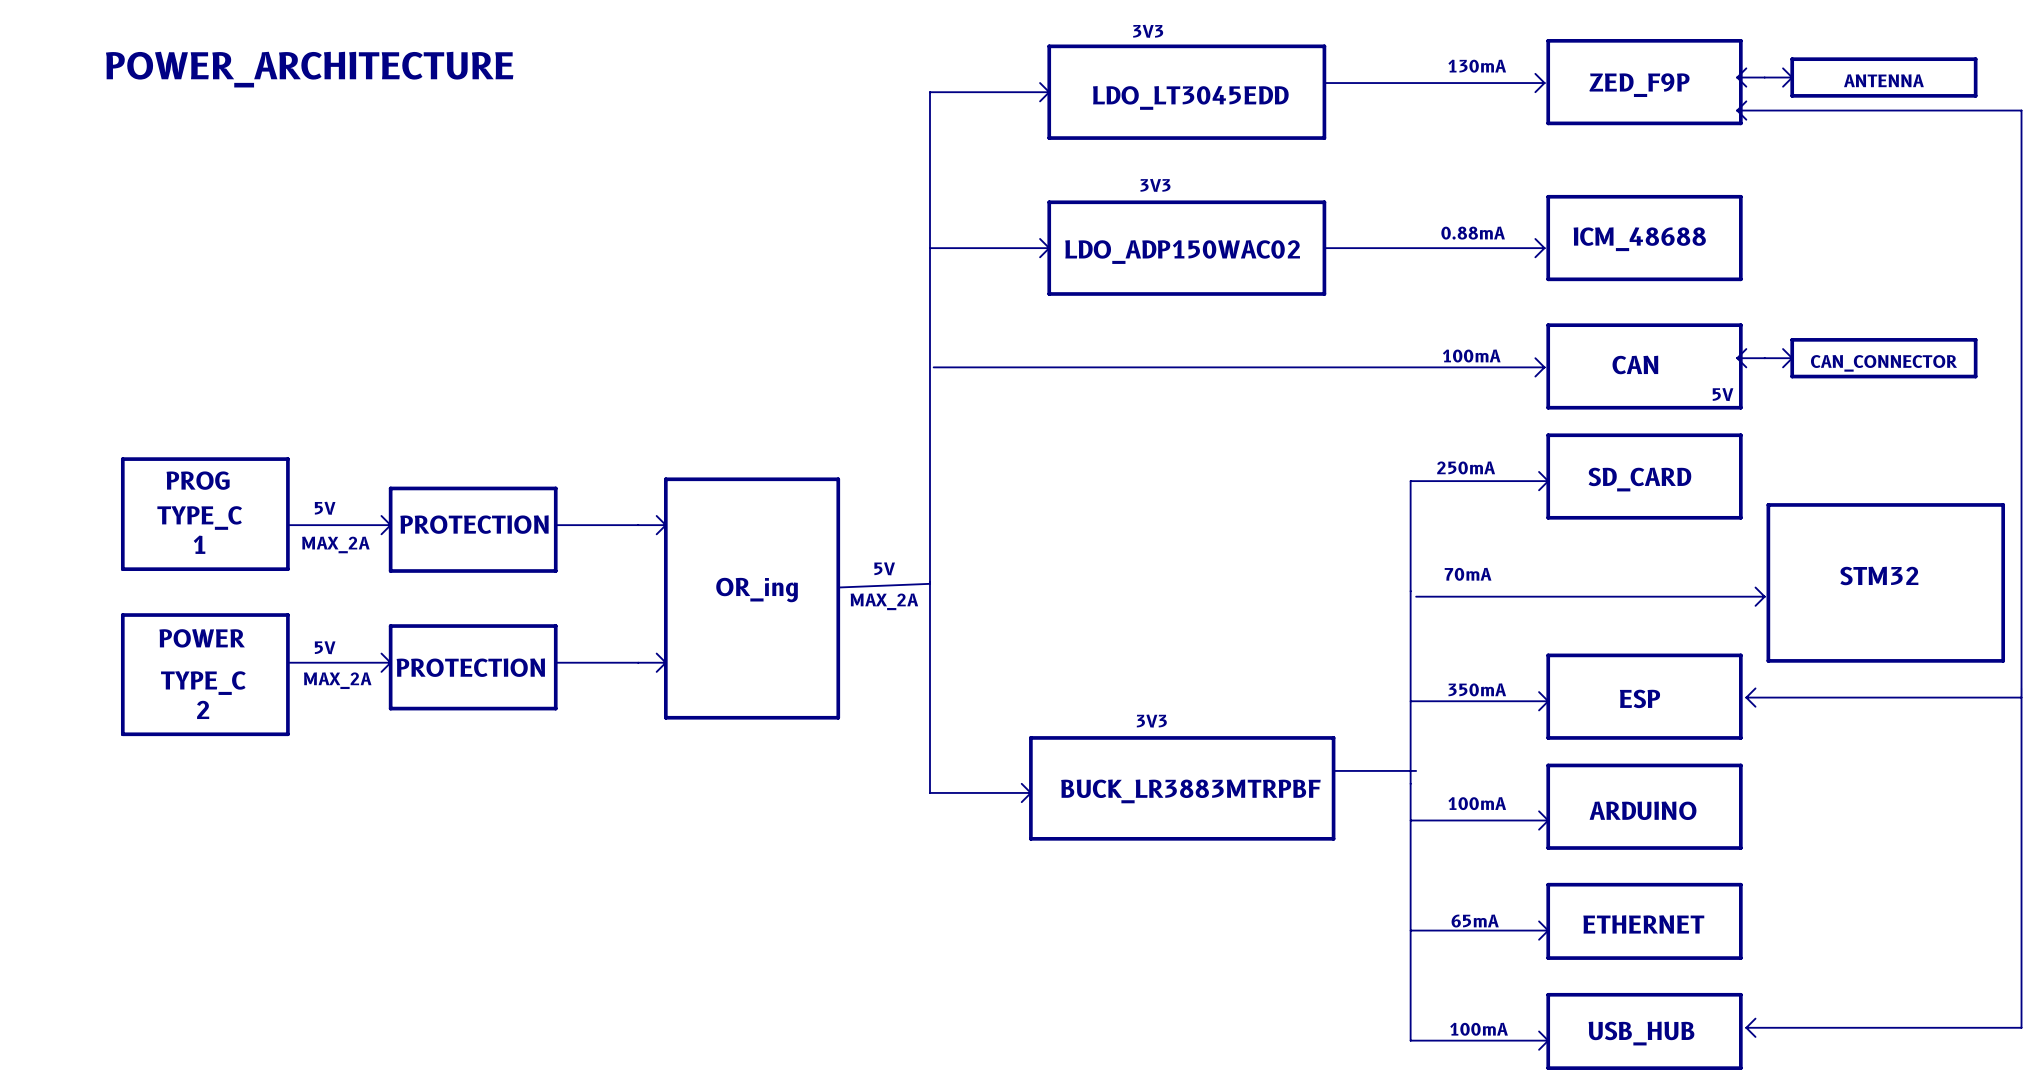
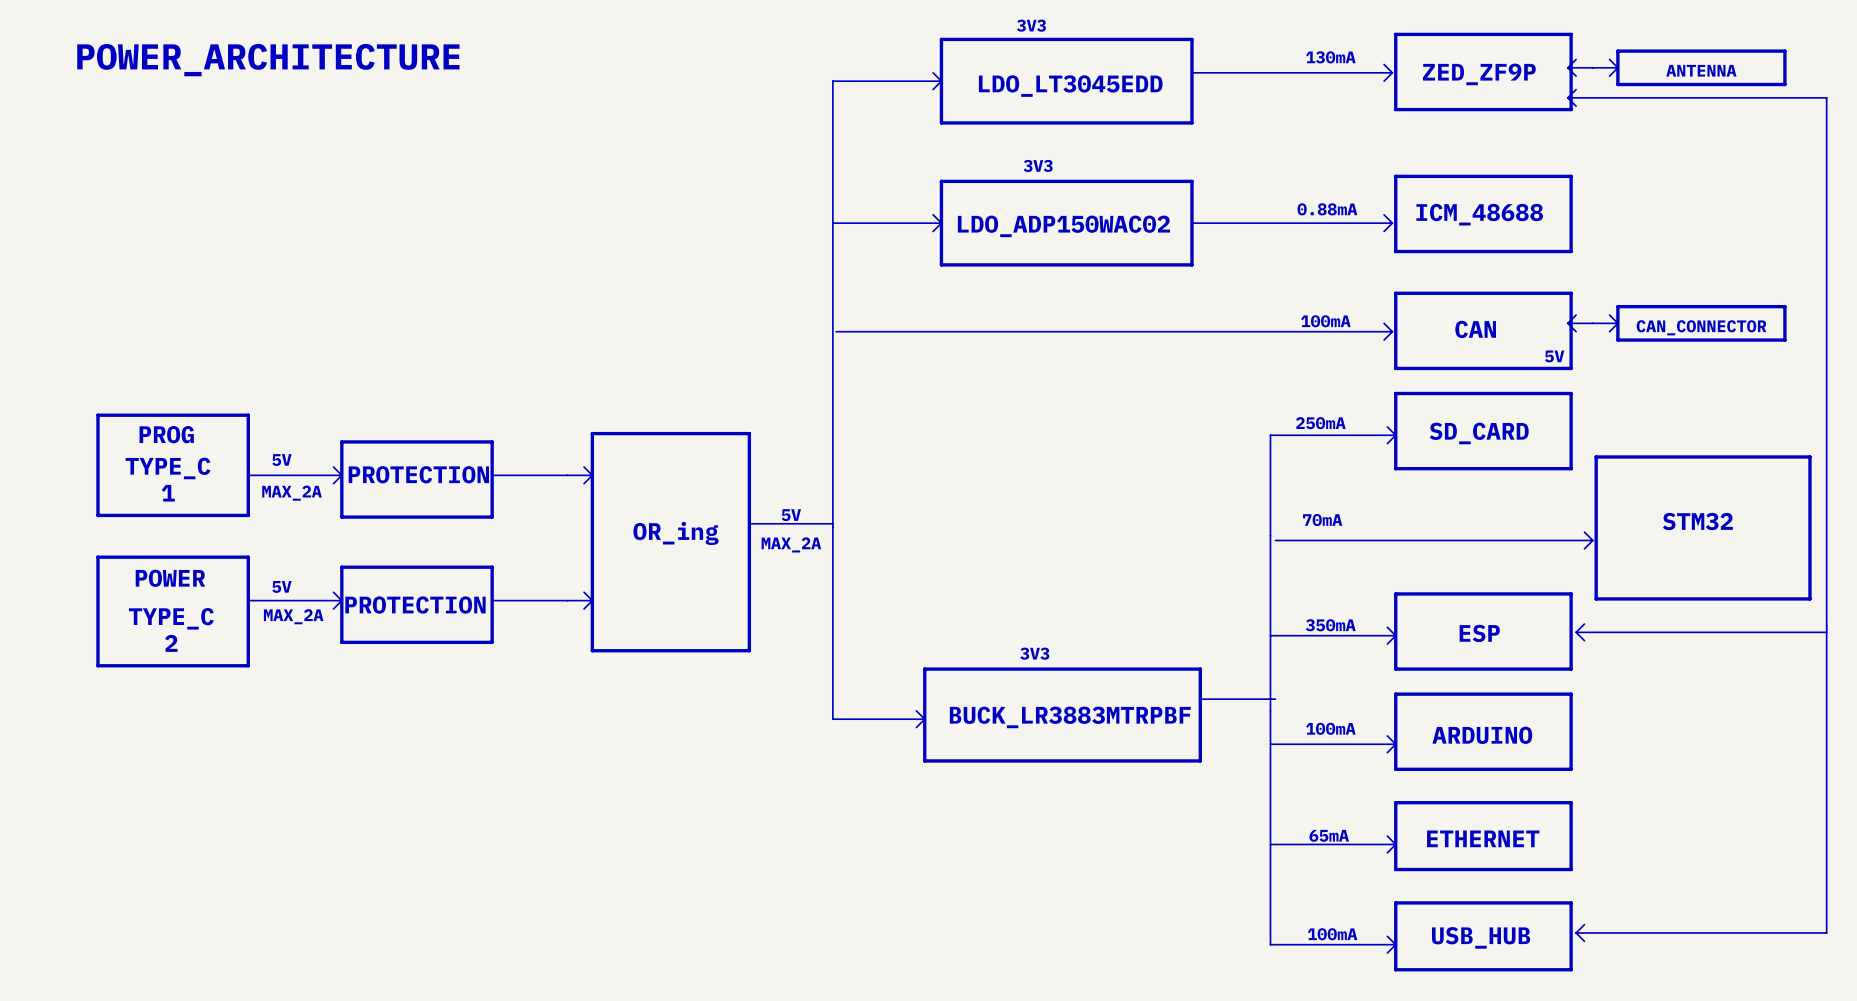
text: ZED_F9P (1639, 85) -> ZED_ZF9P (1479, 74)
line: none -> (749, 523) (832, 523)
line: (929, 583) (838, 587) -> none

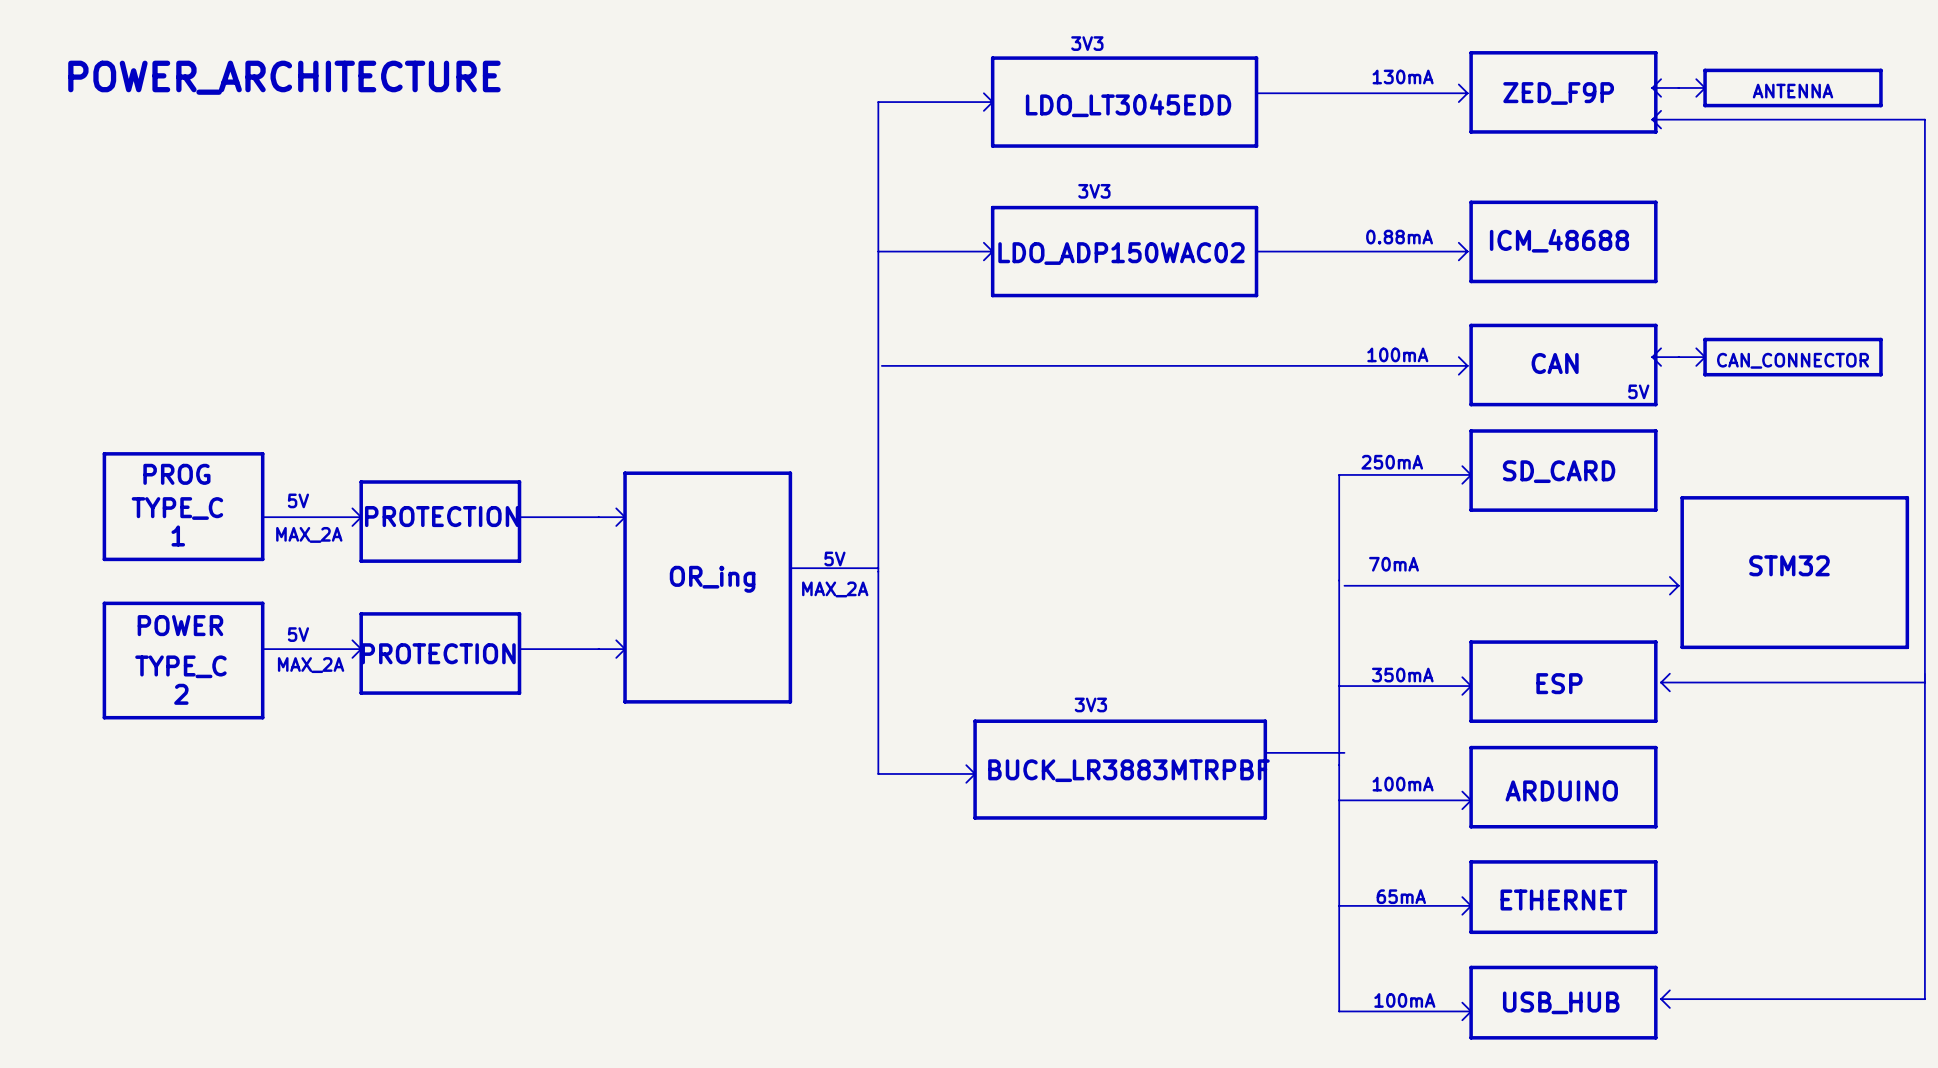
text: ZED_ZF9P (1479, 74) -> ZED_F9P (1558, 93)

